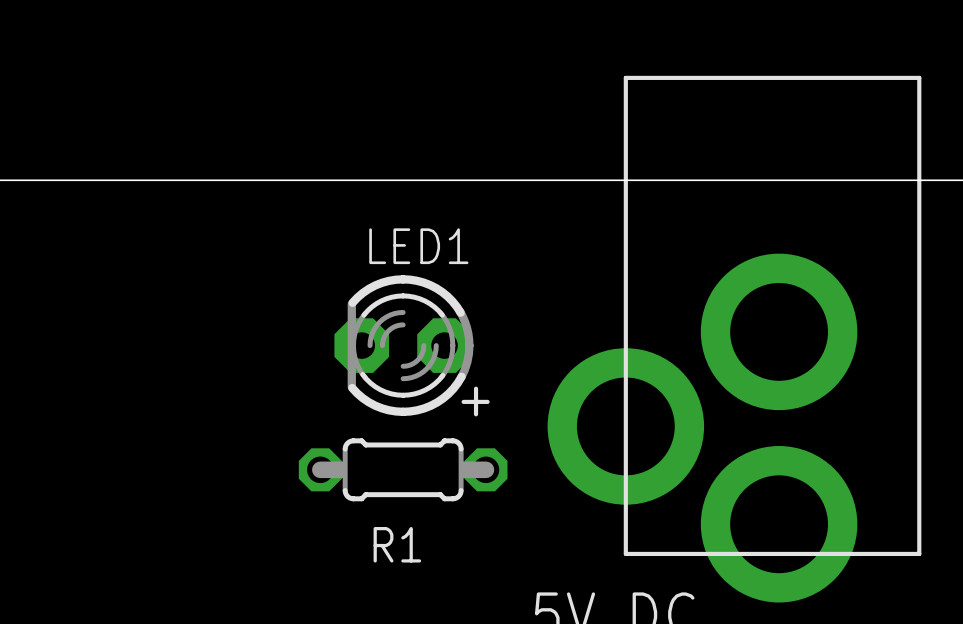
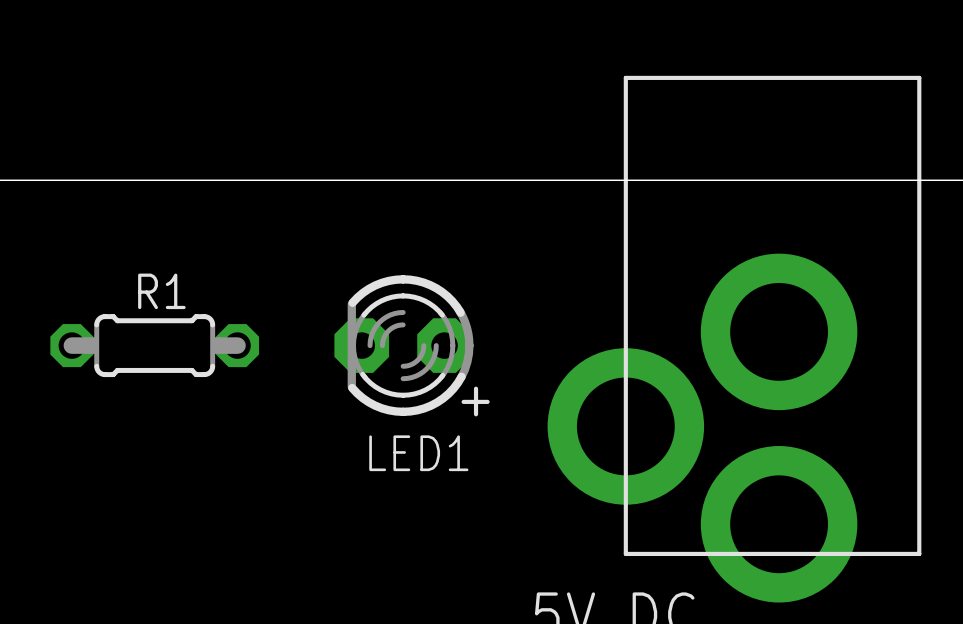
text position: LED1 (418, 246) -> LED1 (418, 453)
R1 position: (403, 469) -> (154, 345)
R1 name position: R1 (397, 544) -> R1 (161, 291)

